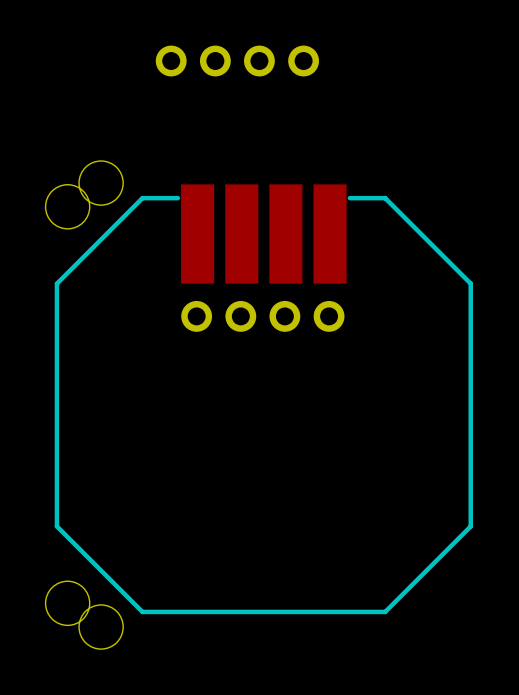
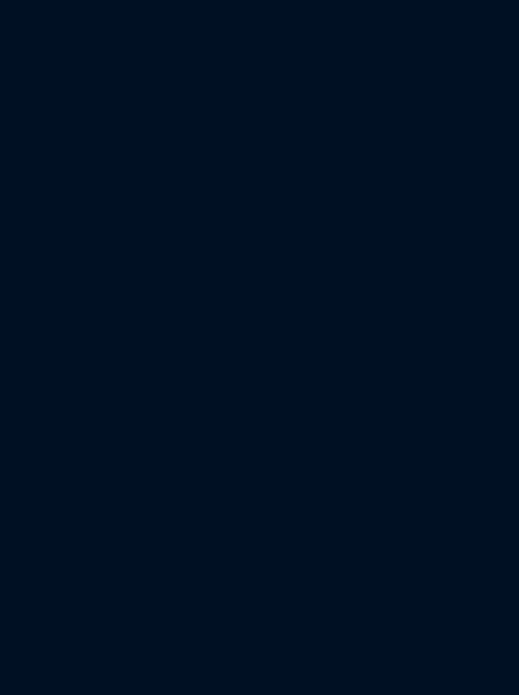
part: (171, 61) -> none
part: (215, 61) -> none
part: (259, 61) -> none
part: (303, 61) -> none
part: (196, 316) -> none
part: (240, 316) -> none
part: (284, 316) -> none
part: (329, 316) -> none
part: (259, 405) -> none

